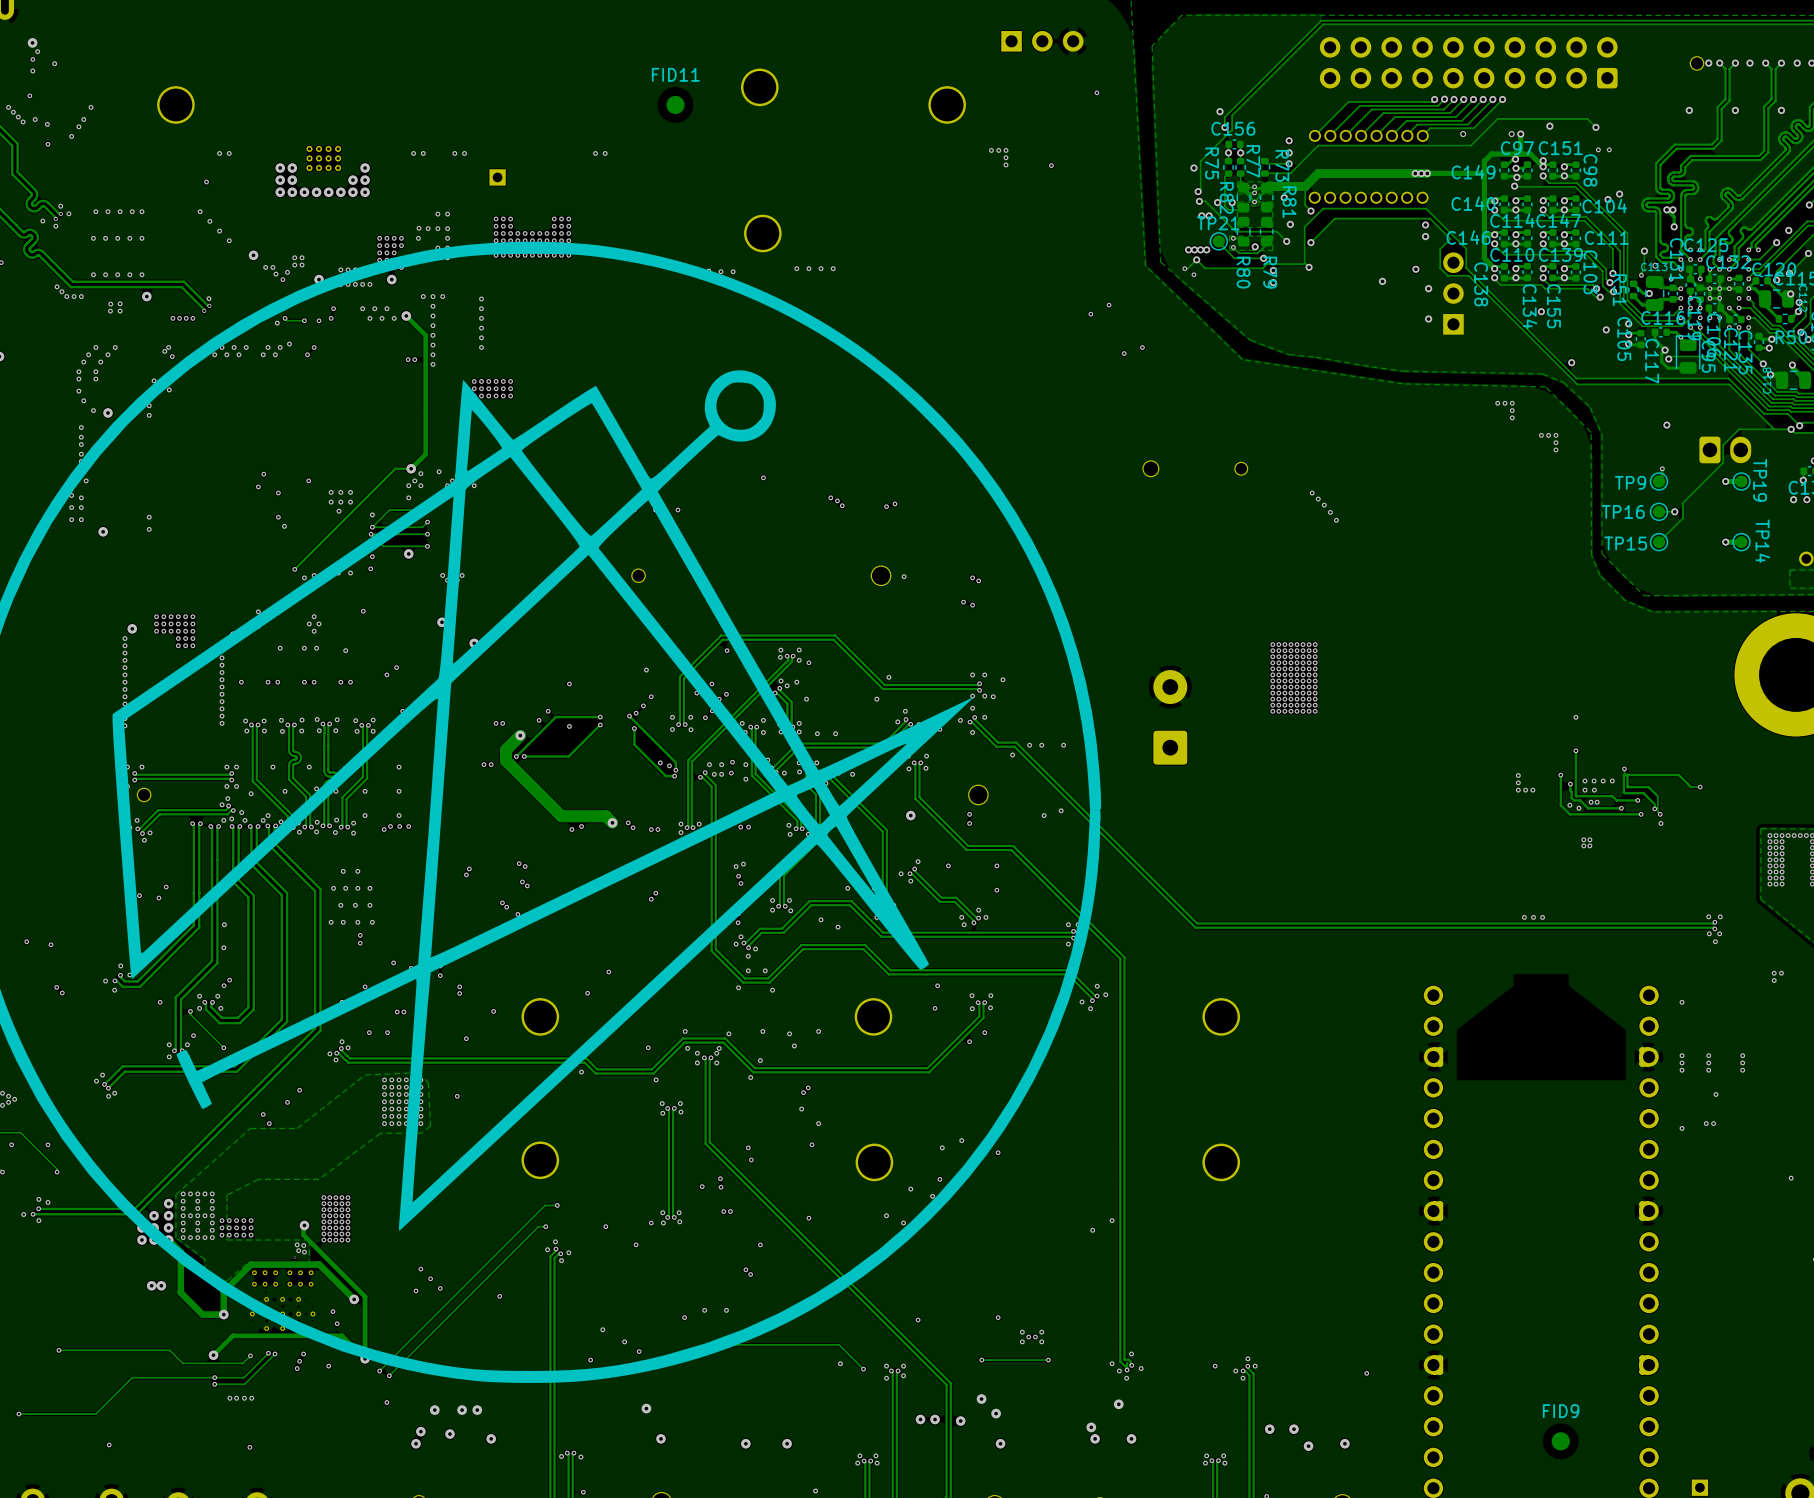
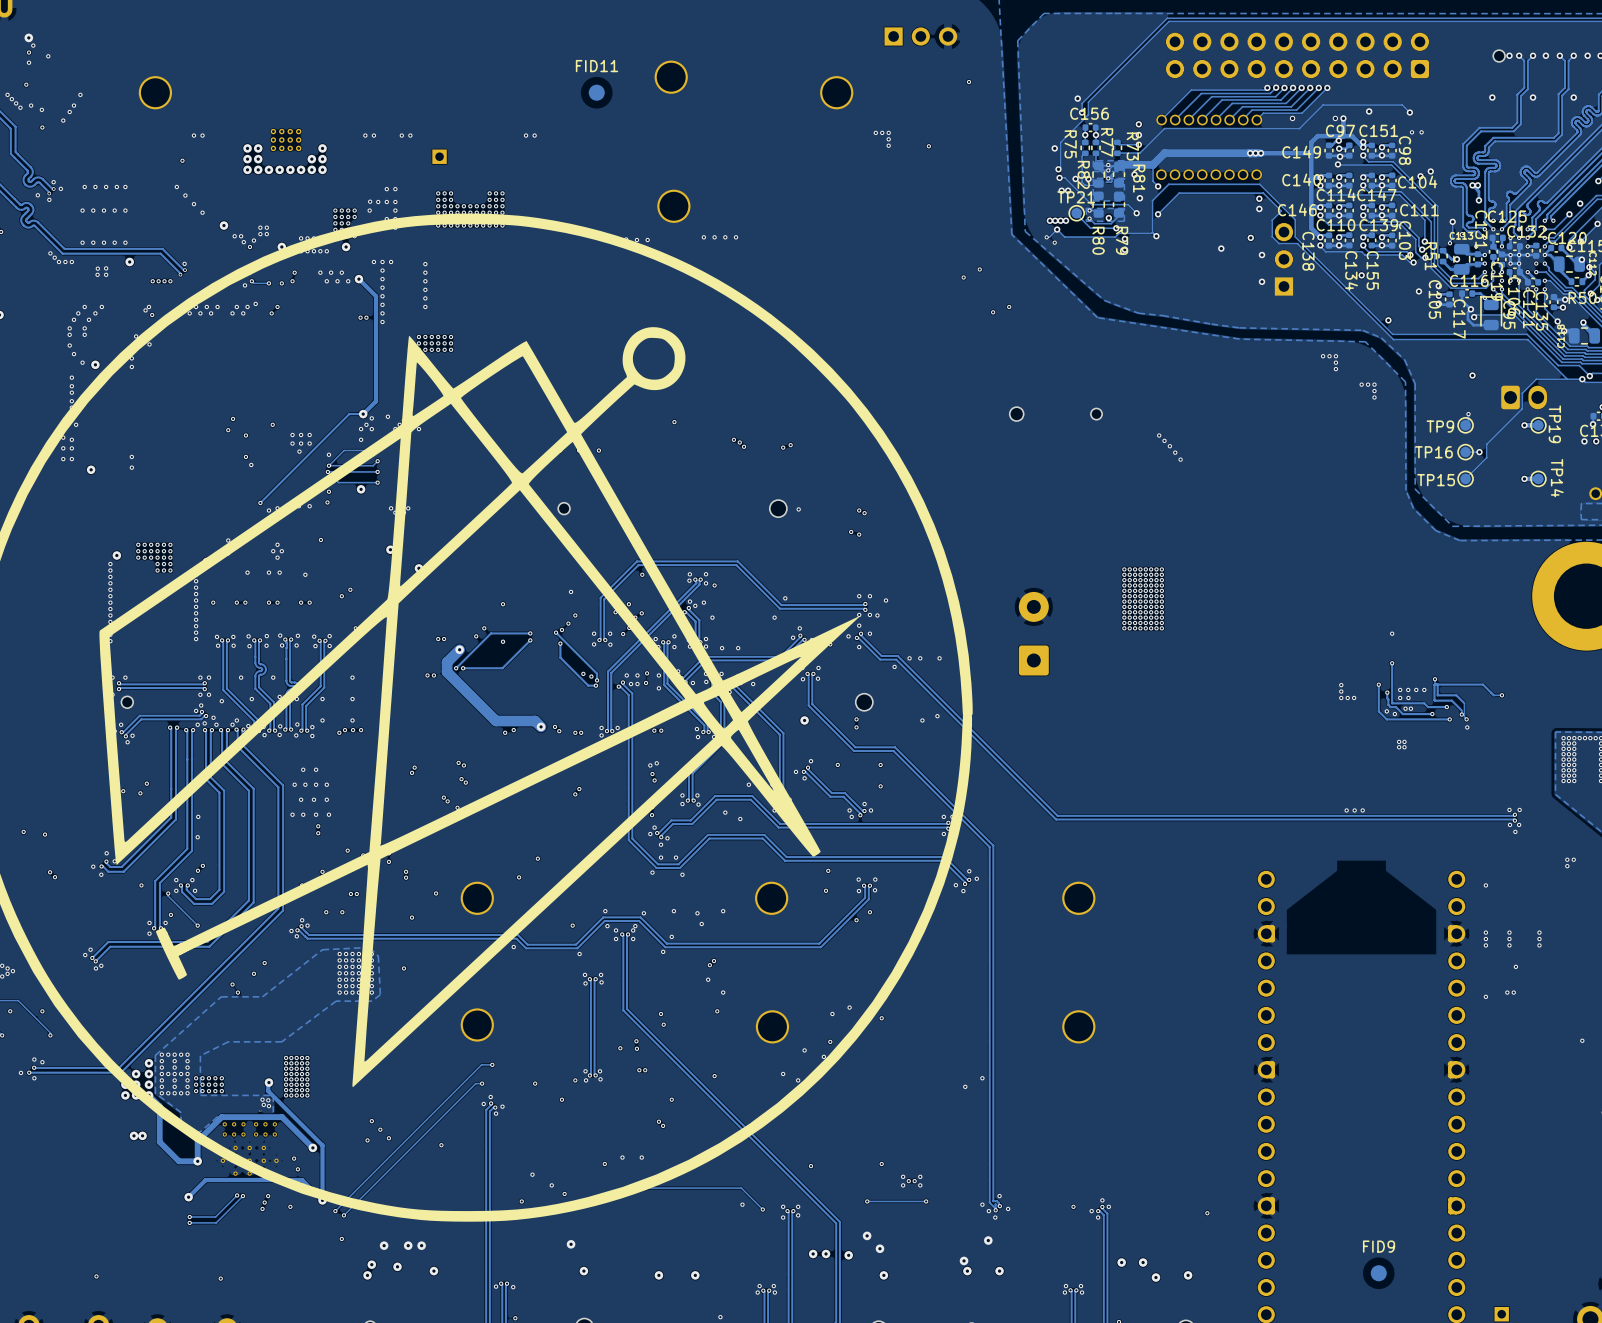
track: (58, 1350) (169, 1350) (182, 1363) (242, 1363) (250, 1355) -> none
via: (58, 1350) -> none
via: (250, 1355) -> none
track: (214, 1377) (132, 1377) (95, 1414) (18, 1414) -> none
via: (229, 1398) -> none
via: (236, 1398) -> none
via: (244, 1398) -> none
via: (251, 1398) -> none
via: (18, 1414) -> none

